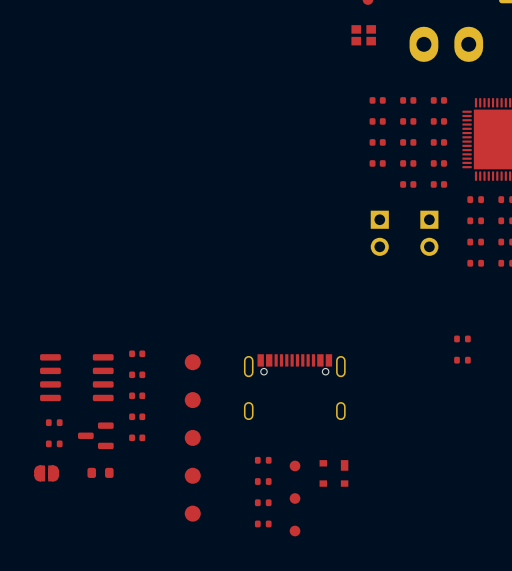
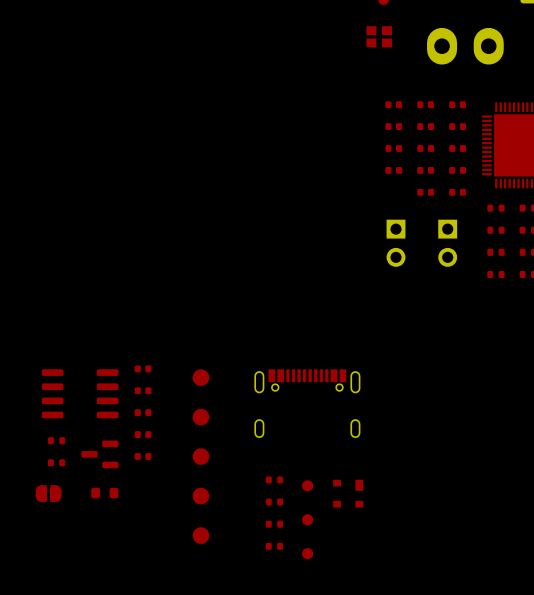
part: (462, 338) -> none
part: (462, 360) -> none

